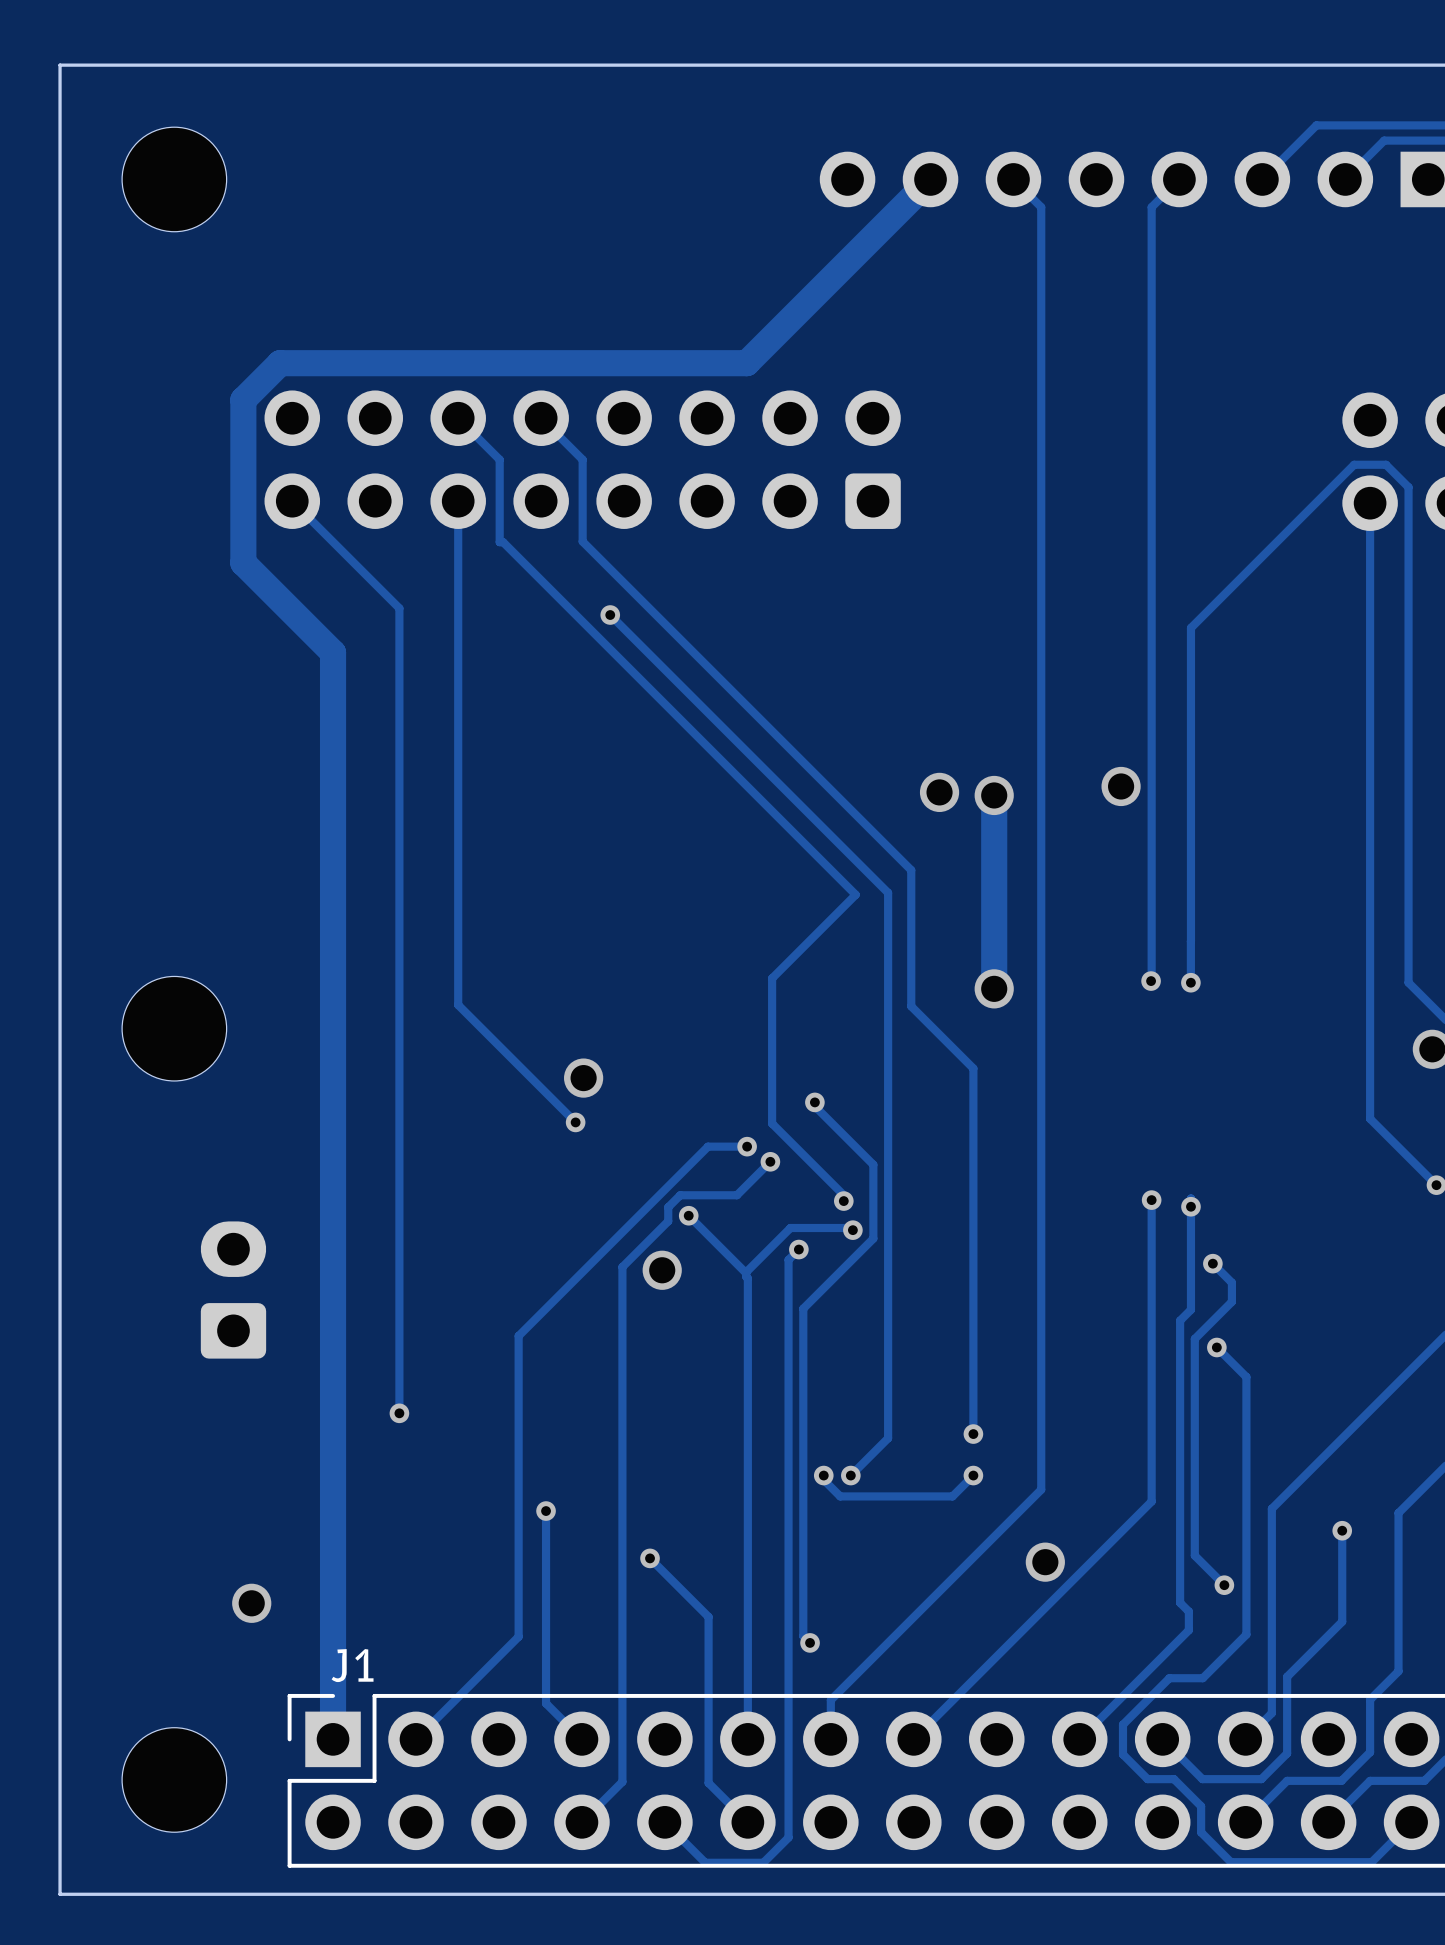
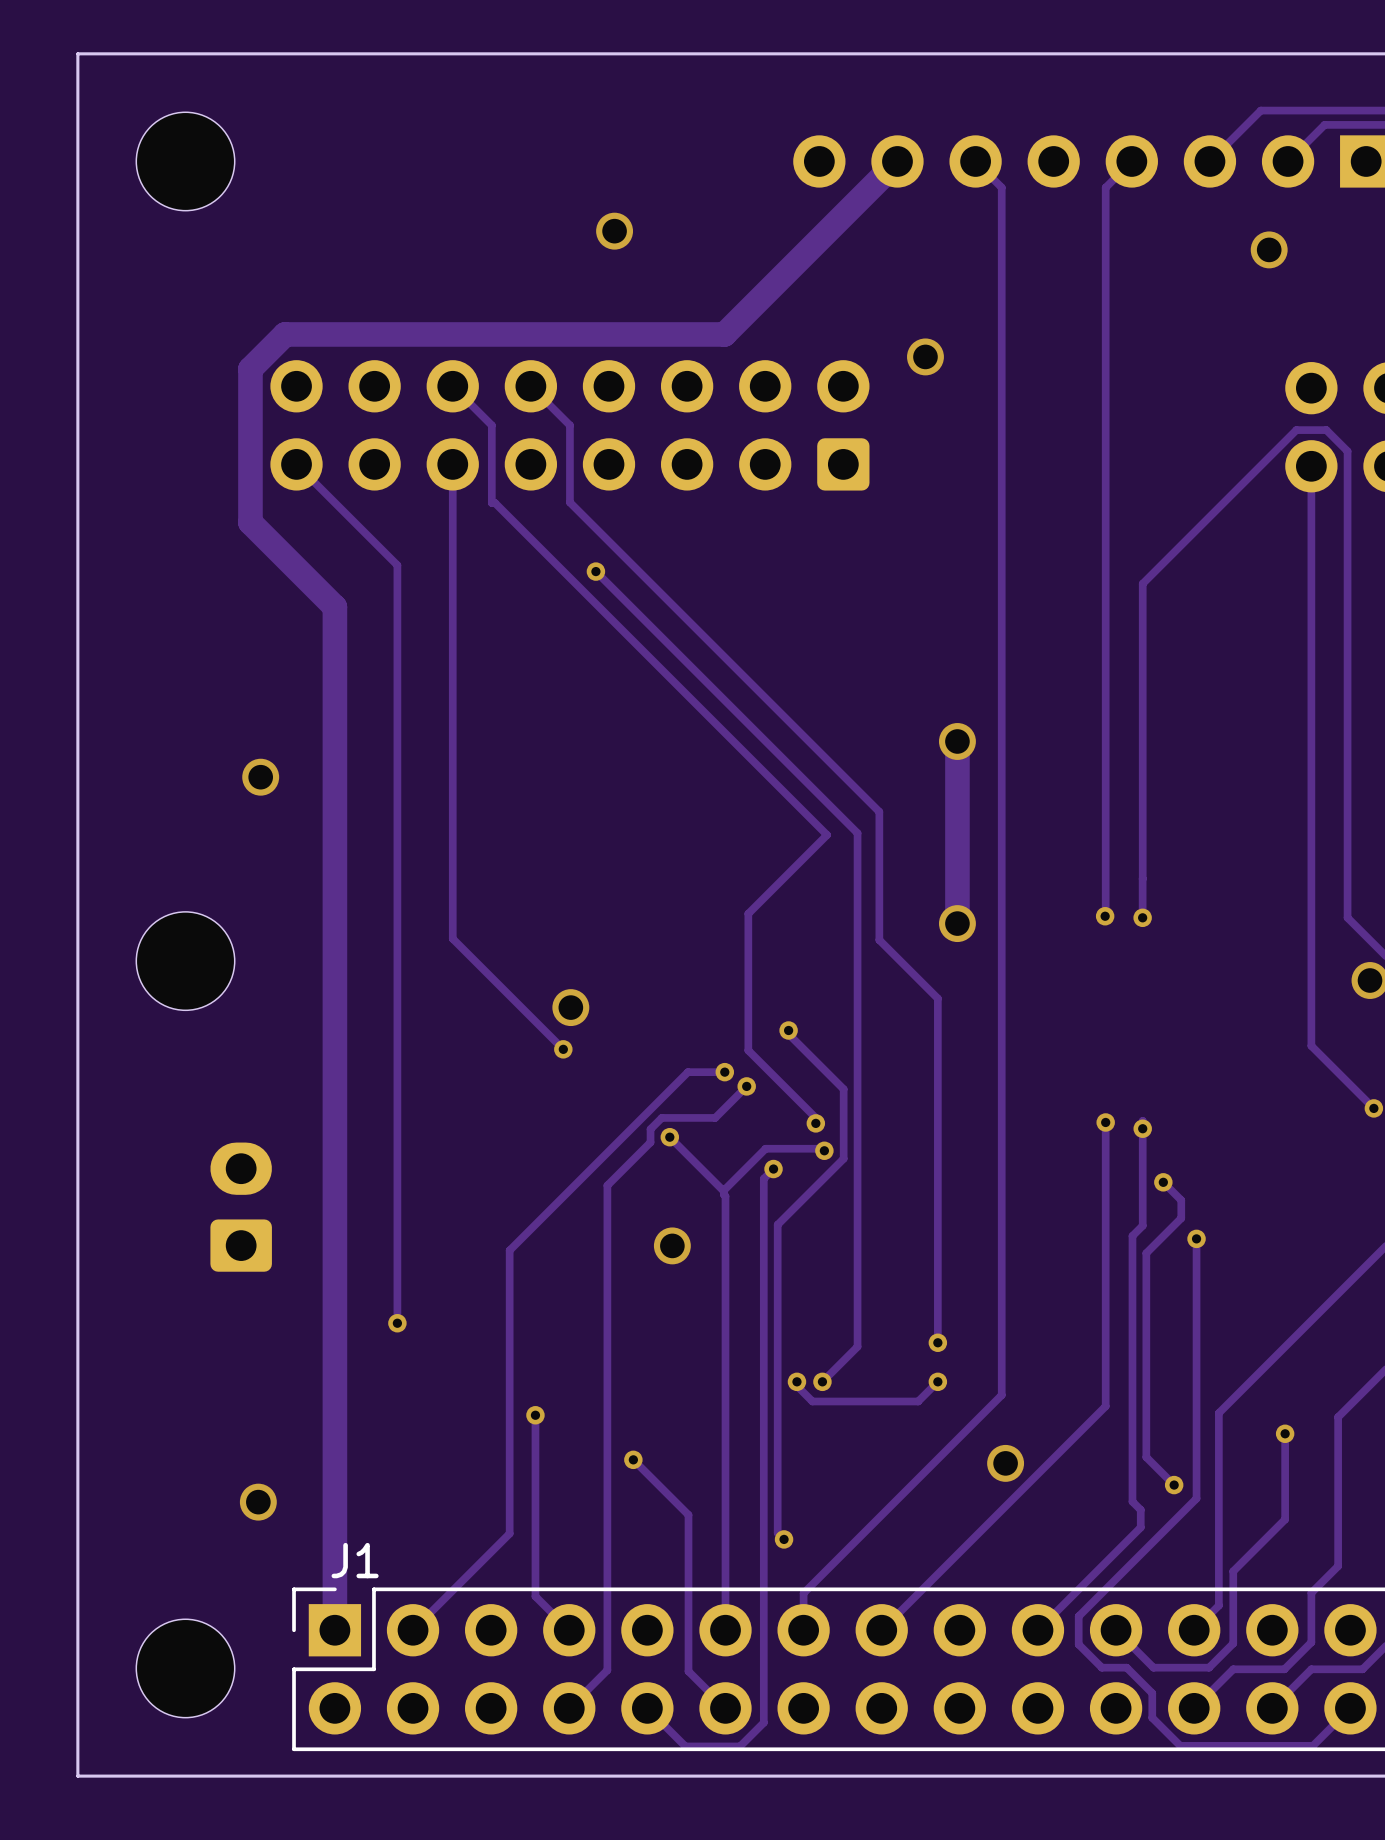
via: none -> (614, 231)
via: none -> (1269, 249)
via: none -> (925, 356)
via: (1121, 786) -> none
via: (939, 792) -> none
via: none -> (260, 777)
via position: (662, 1270) -> (672, 1245)
track: (1216, 1347) (1246, 1377) (1246, 1634) (1202, 1678) (1169, 1678) -> (1196, 1238) (1196, 1498) (1122, 1572)
via position: (1216, 1347) -> (1196, 1238)

